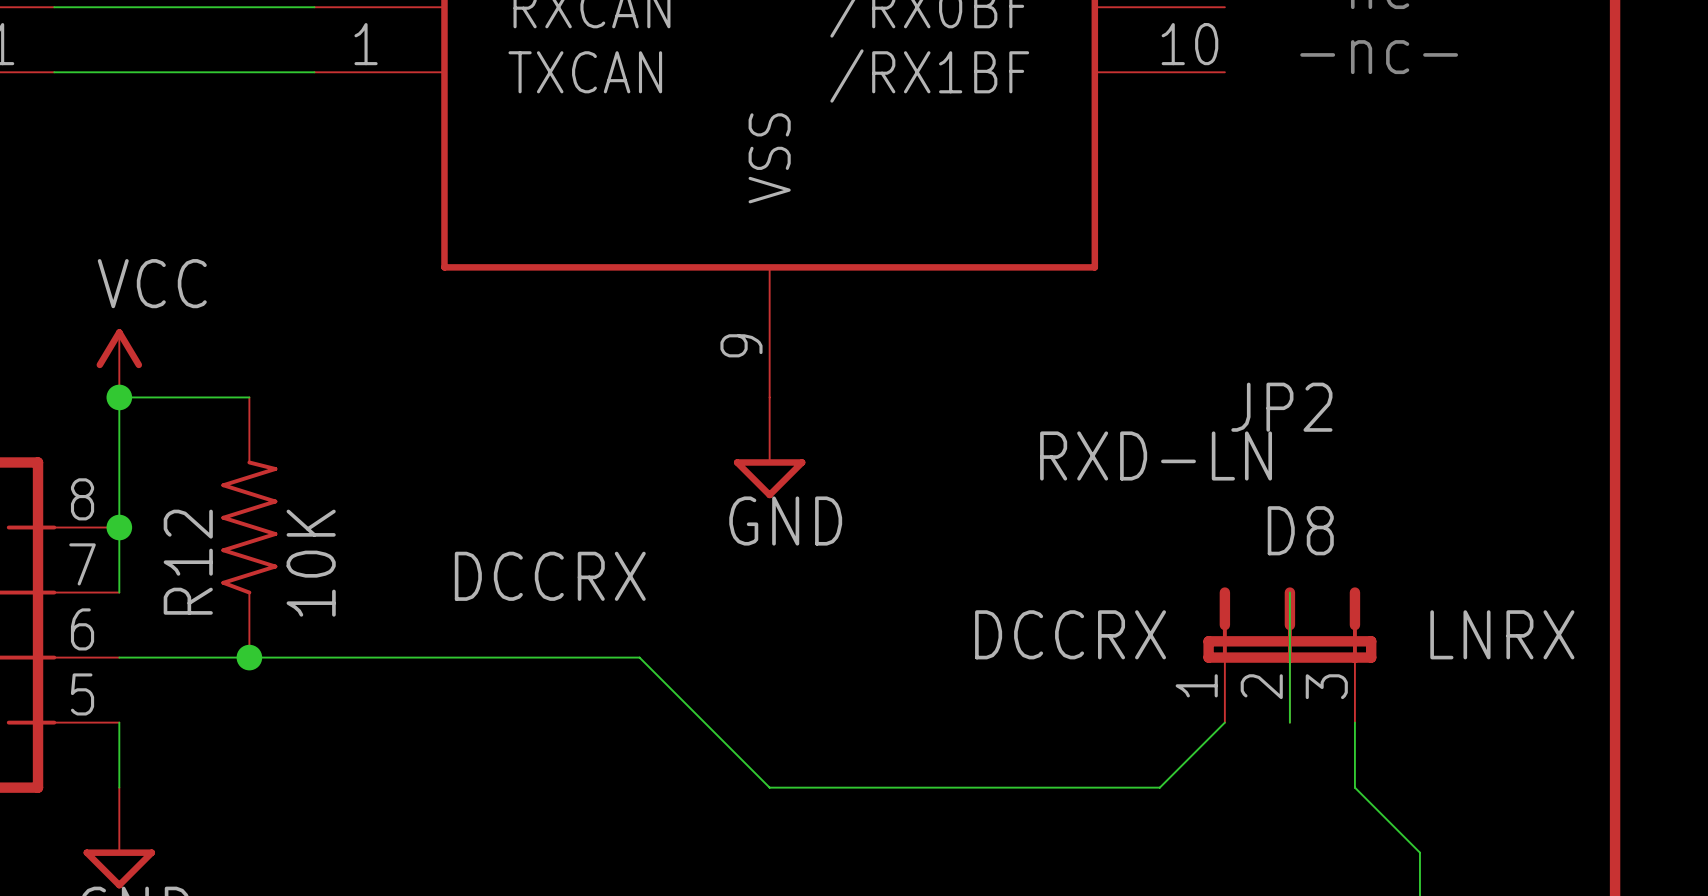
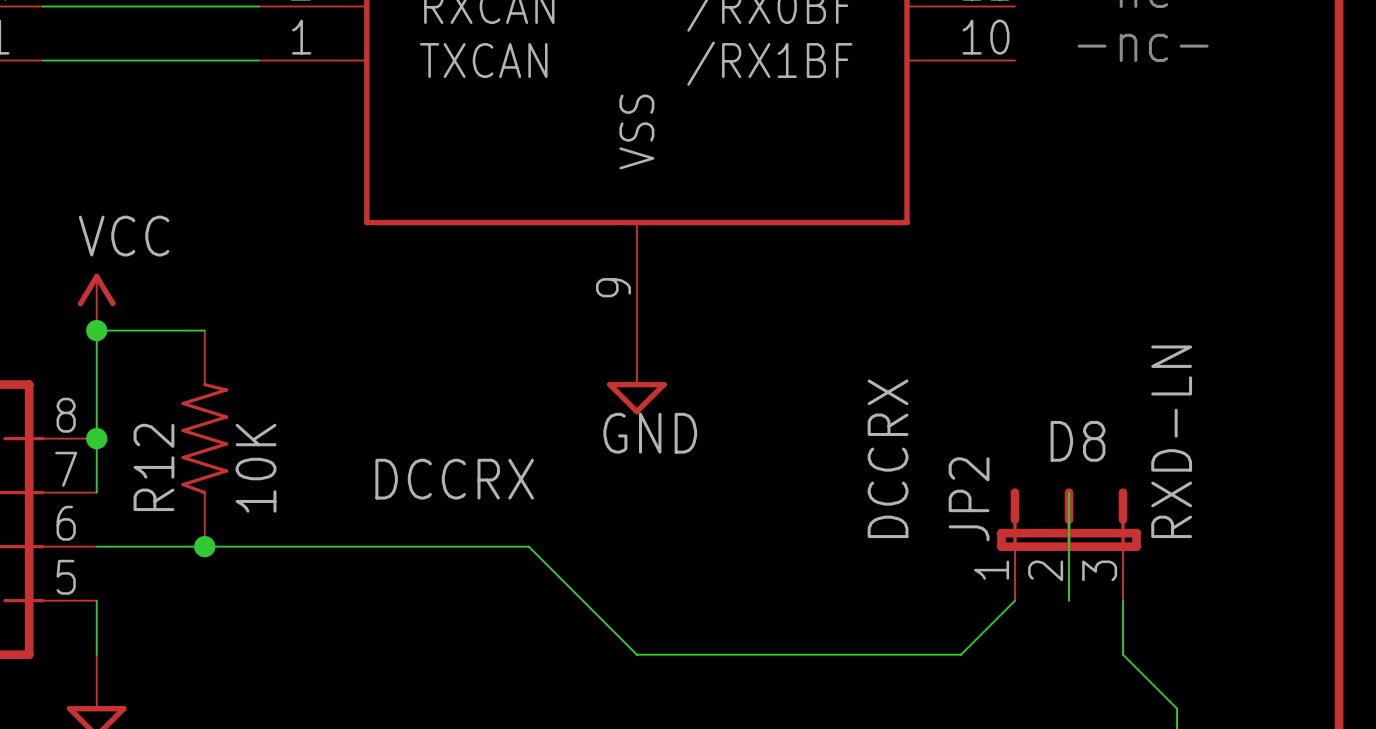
JP2 name rotation: 0° (1281, 407) -> 90° counterclockwise (969, 499)
JP2 name position: JP2 (1281, 407) -> JP2 (969, 499)
JP2 value rotation: 0° (1156, 455) -> 90° counterclockwise (1171, 441)
label rotation: 0° (1070, 634) -> 90° counterclockwise (888, 458)
label: LNRX (1502, 634) -> none

